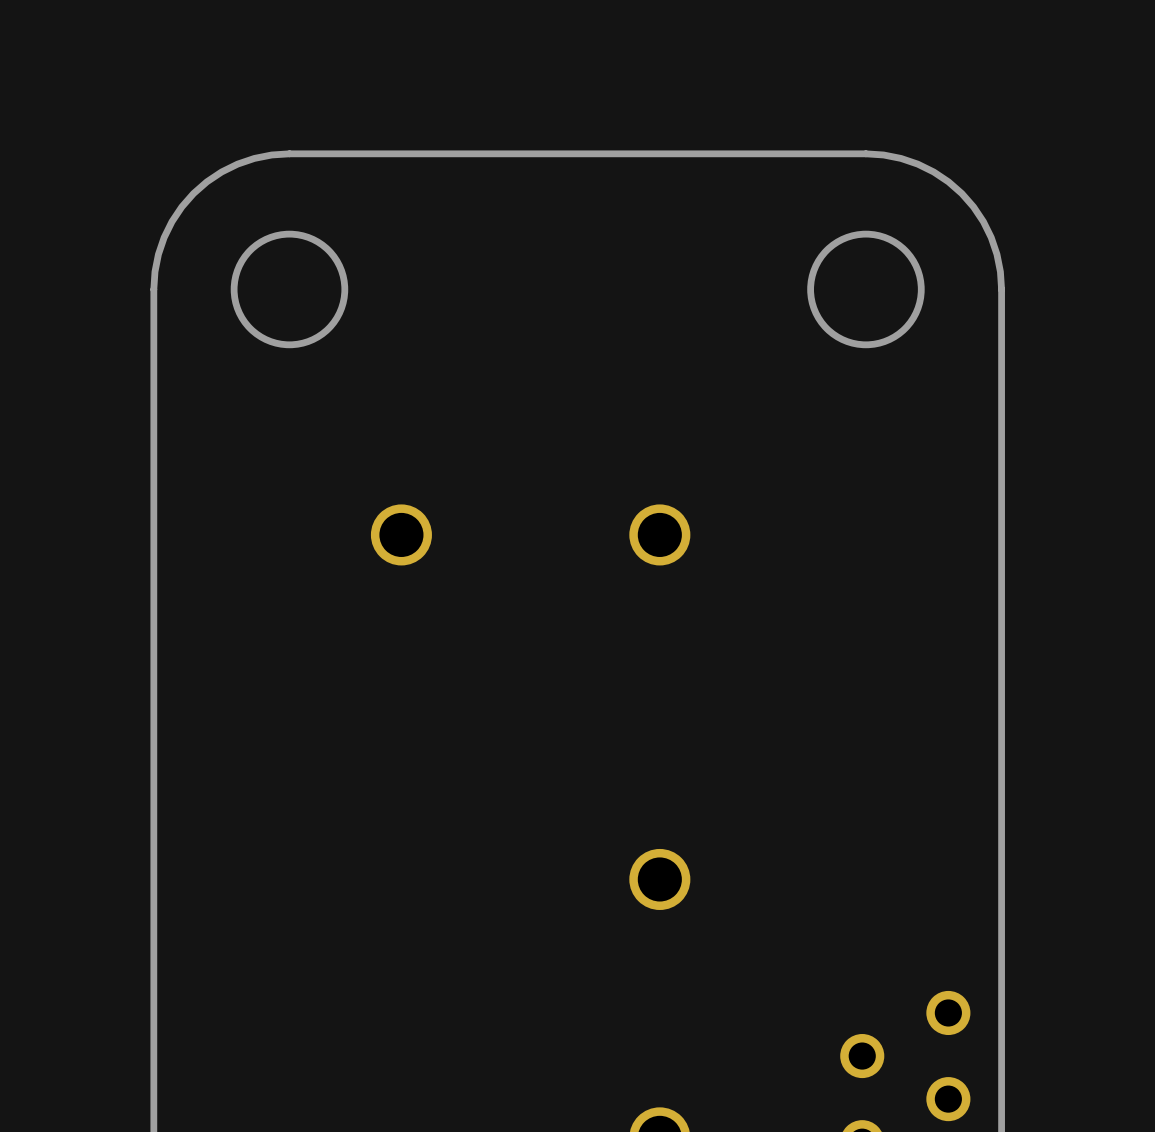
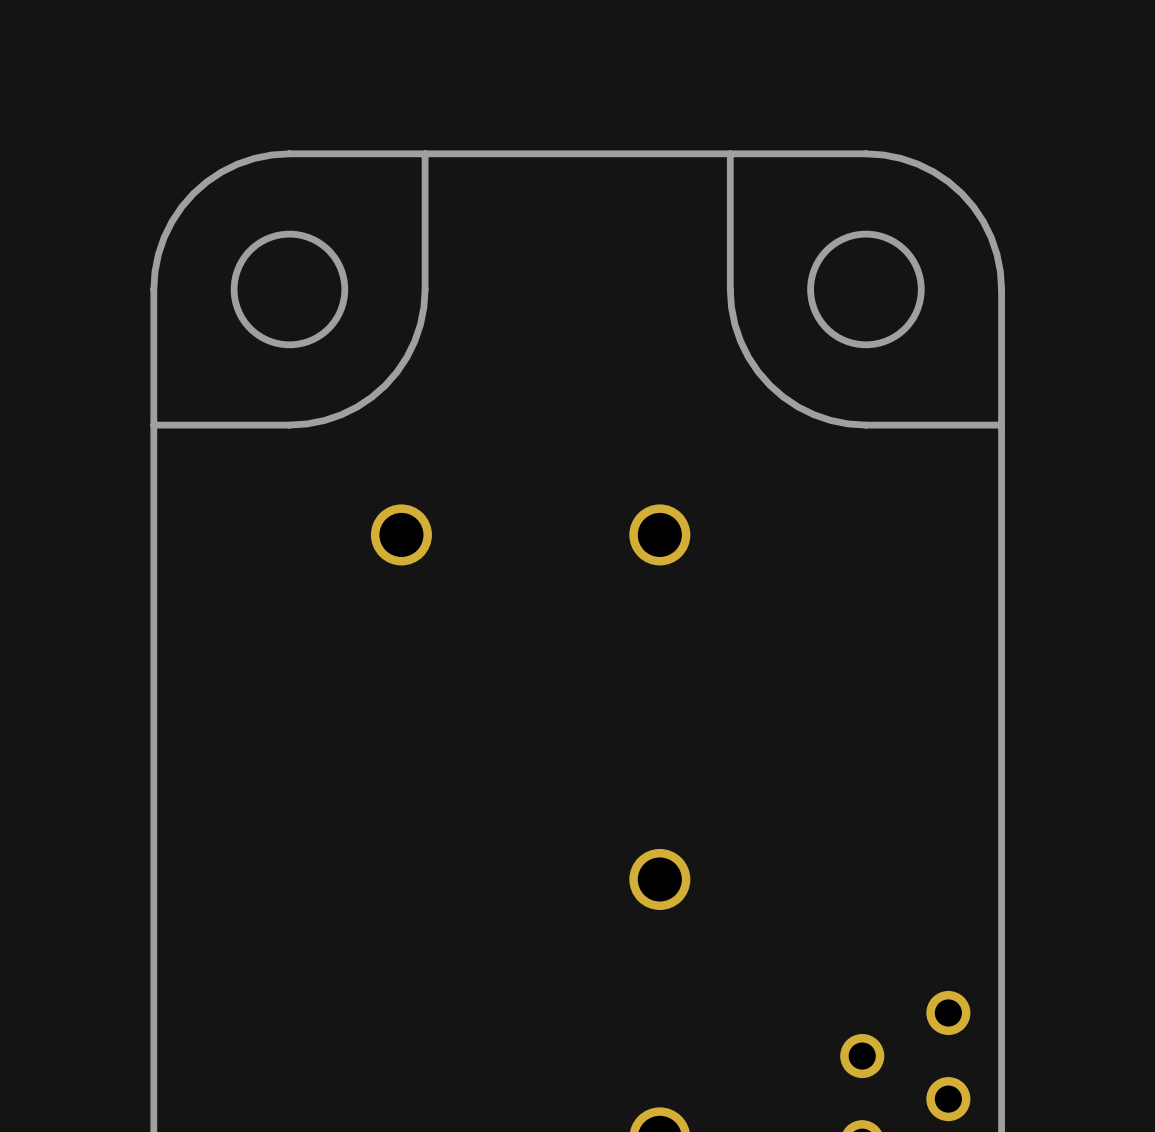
board edge: none -> (425, 153) (423, 307) (414, 341) (397, 372) (385, 385) (372, 397) (341, 414) (307, 423) (153, 425)
board edge: none -> (730, 153) (731, 307) (740, 341) (758, 372) (770, 385) (783, 397) (814, 414) (848, 423) (1001, 425)

